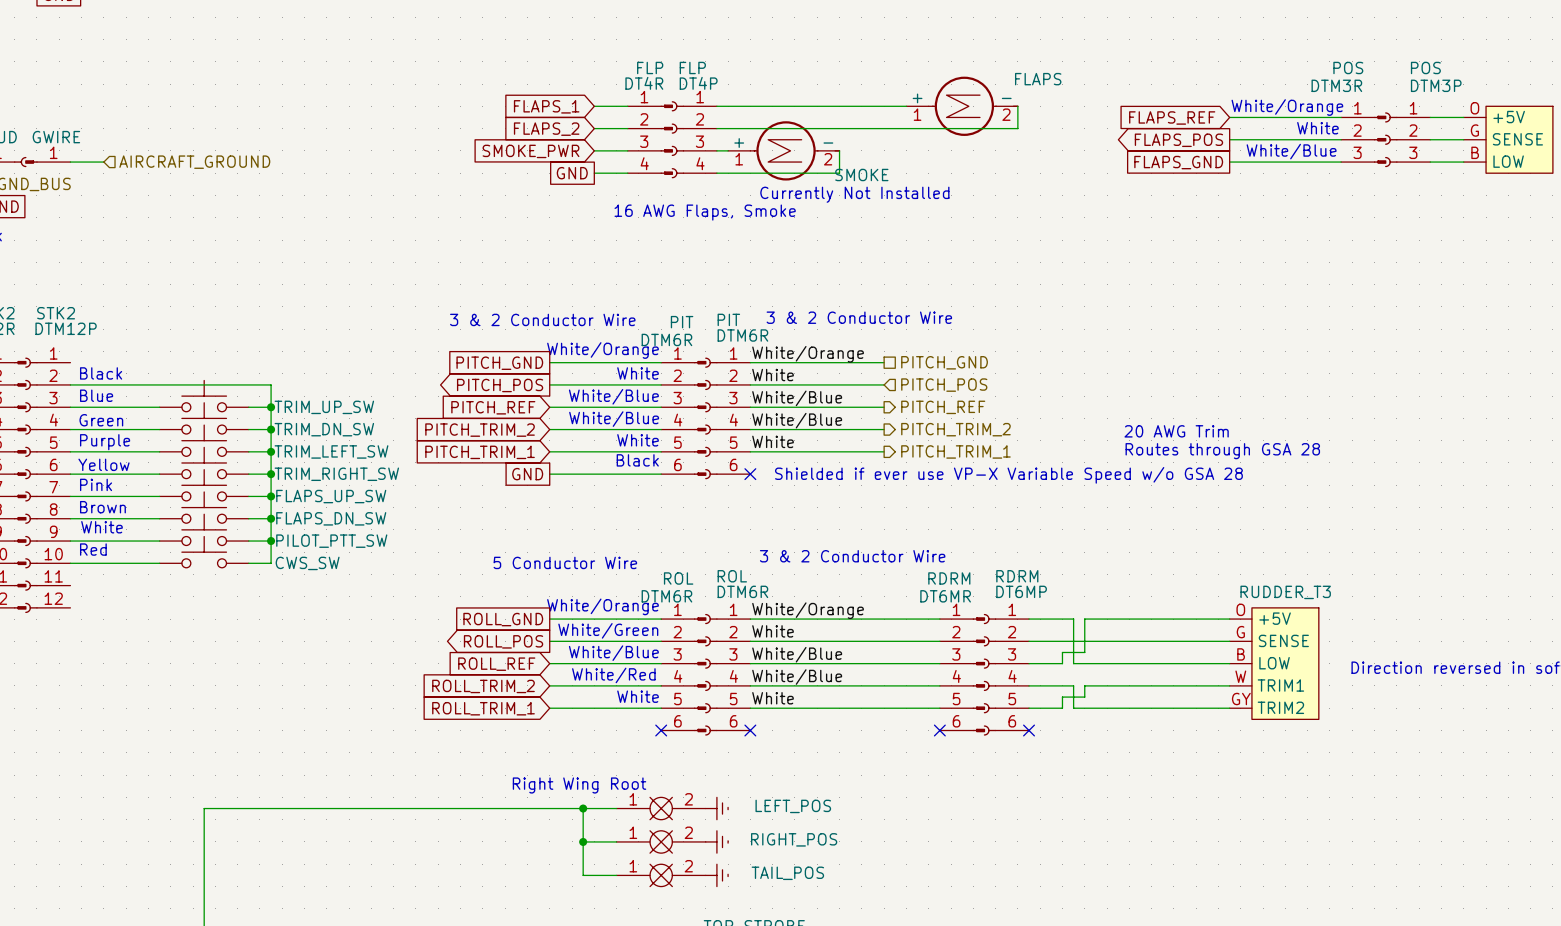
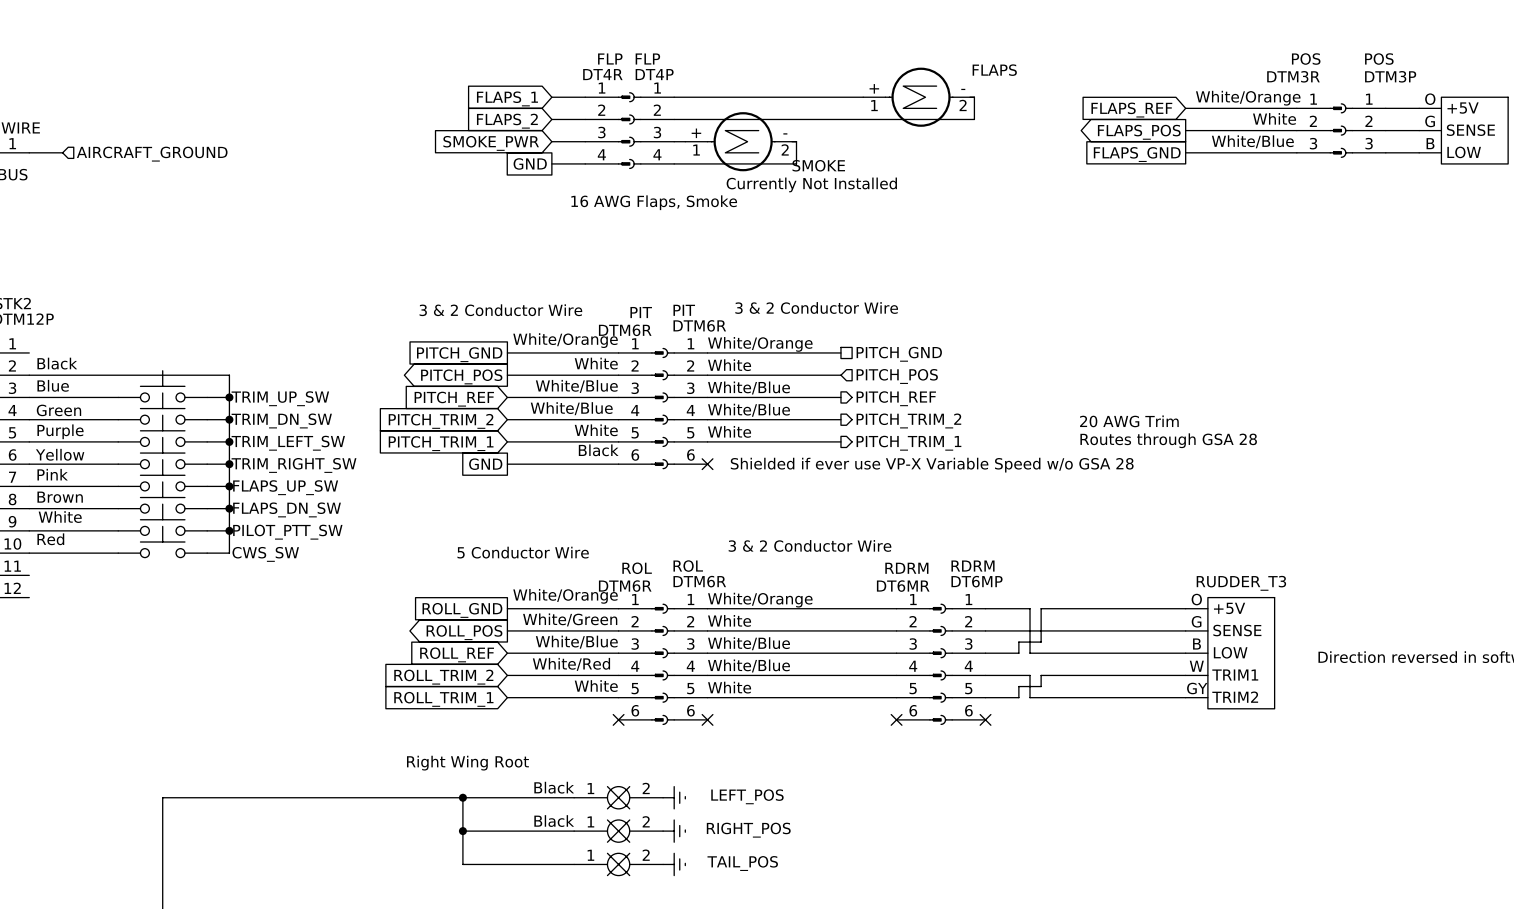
text position: Right Wing Root (579, 785) -> Right Wing Root (467, 763)
label: none -> Black (554, 787)
junction: none -> (462, 797)
wire: (583, 808) (583, 875) -> (462, 797) (462, 864) (540, 864)
junction: (583, 808) -> none
label: none -> Black (554, 821)
wire: none -> (462, 831) (540, 831)
junction: none -> (462, 831)
junction: (583, 841) -> none

